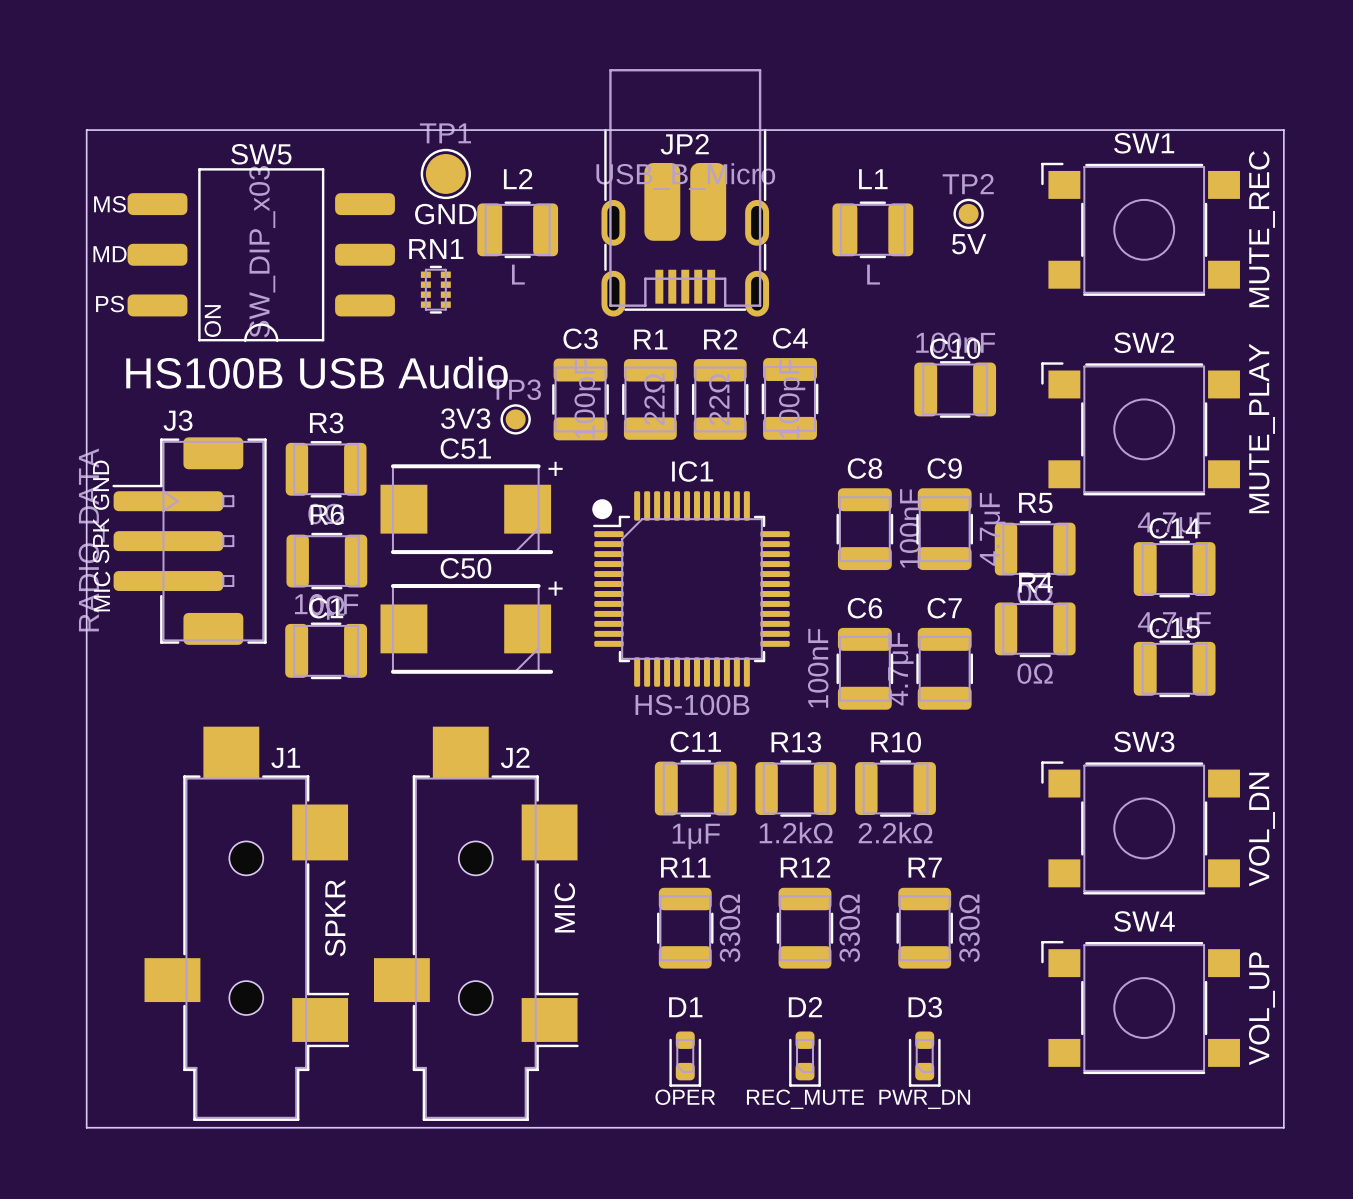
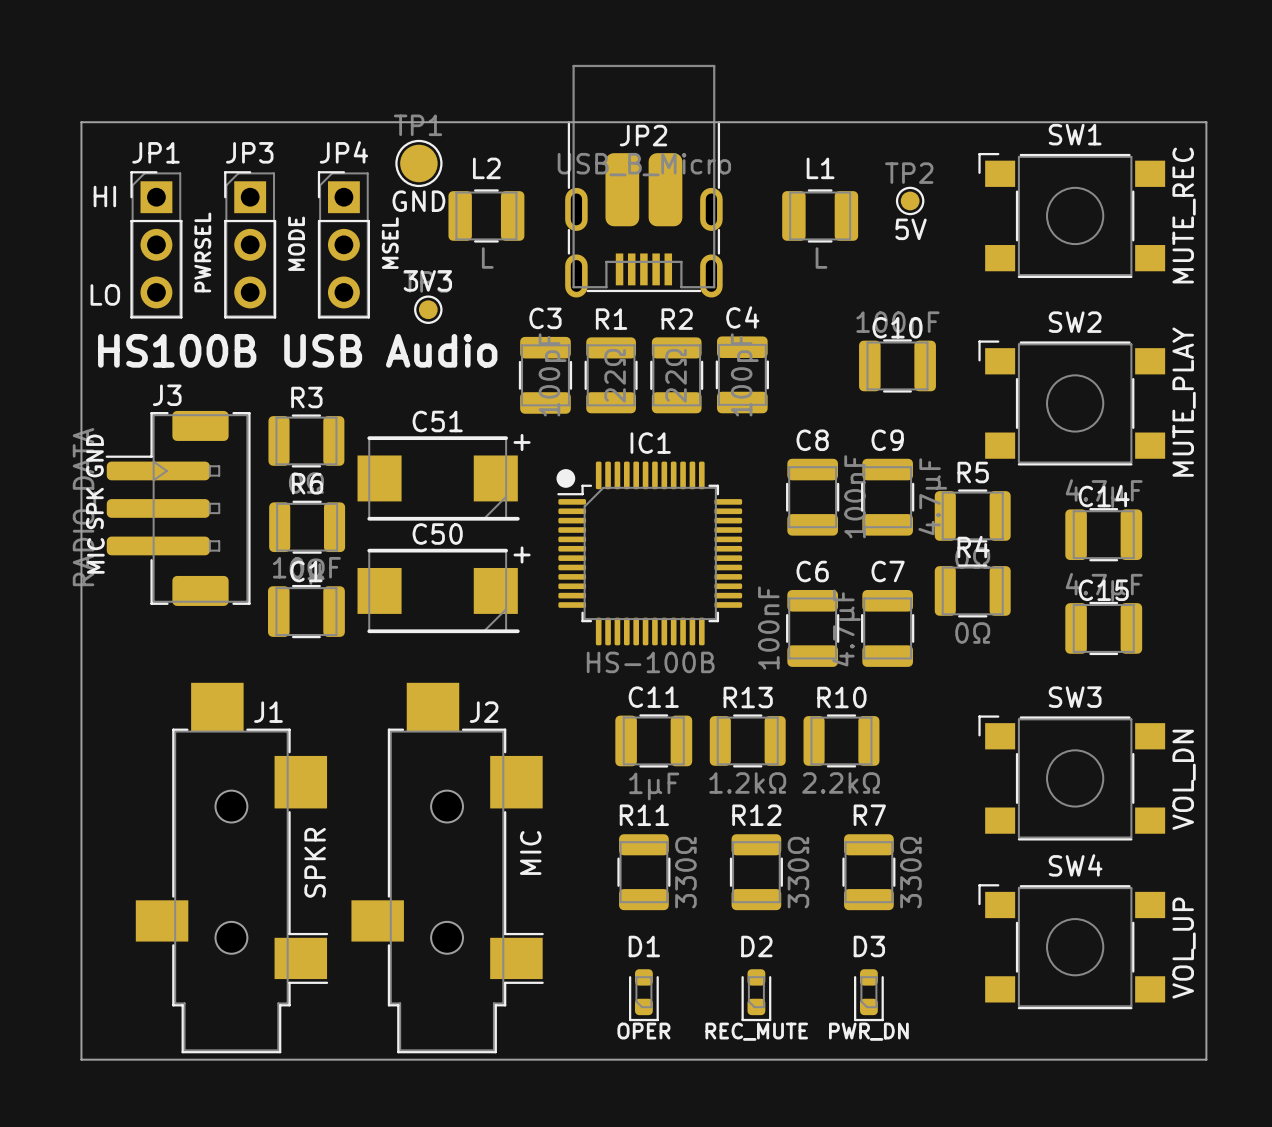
text: none -> HI (104, 196)
SW5: SW_DIP_x03 (261, 254) -> none
JP1: none -> PWRSEL (156, 244)
JP3: none -> MODE (250, 244)
JP4: none -> MSEL (343, 244)
RN1: (435, 289) -> none
text: none -> LO (105, 294)
TP3 value position: 3V3 (465, 418) -> 3V3 (427, 280)
TP3 position: (515, 419) -> (428, 309)

